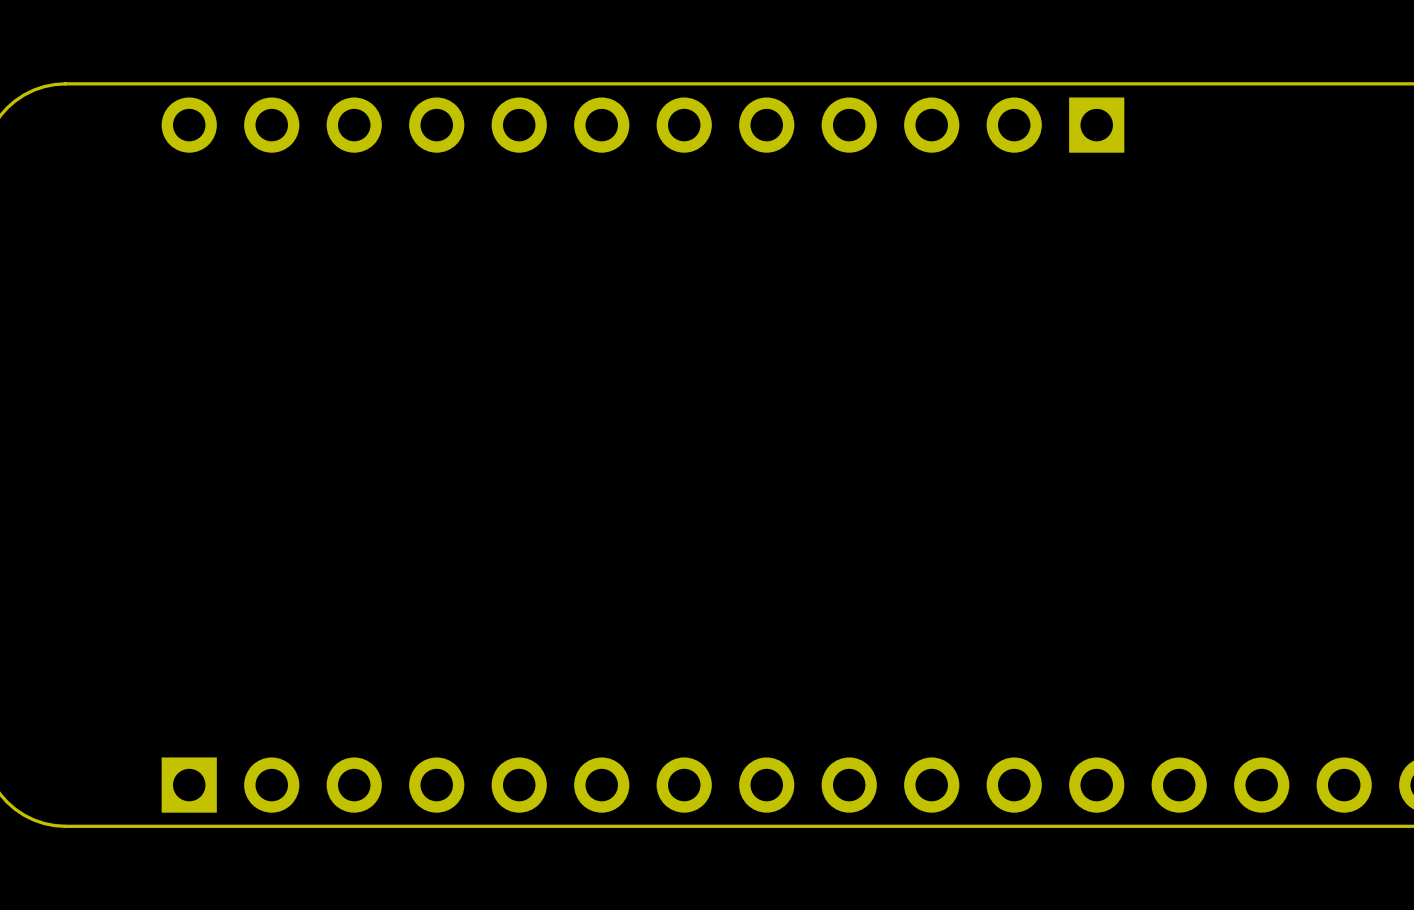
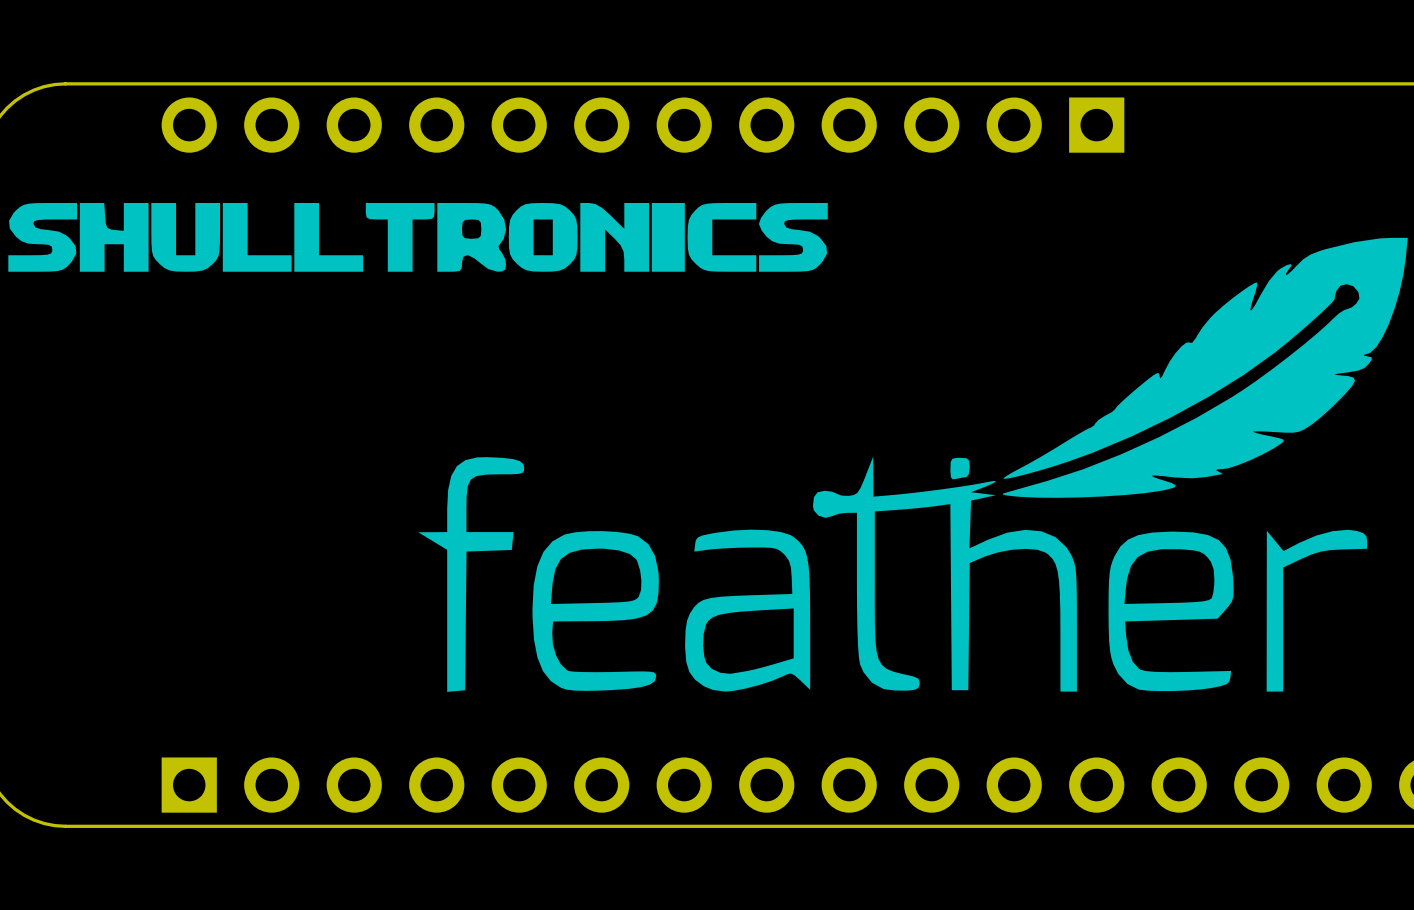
drawing: none -> [8, 202, 1408, 692]

